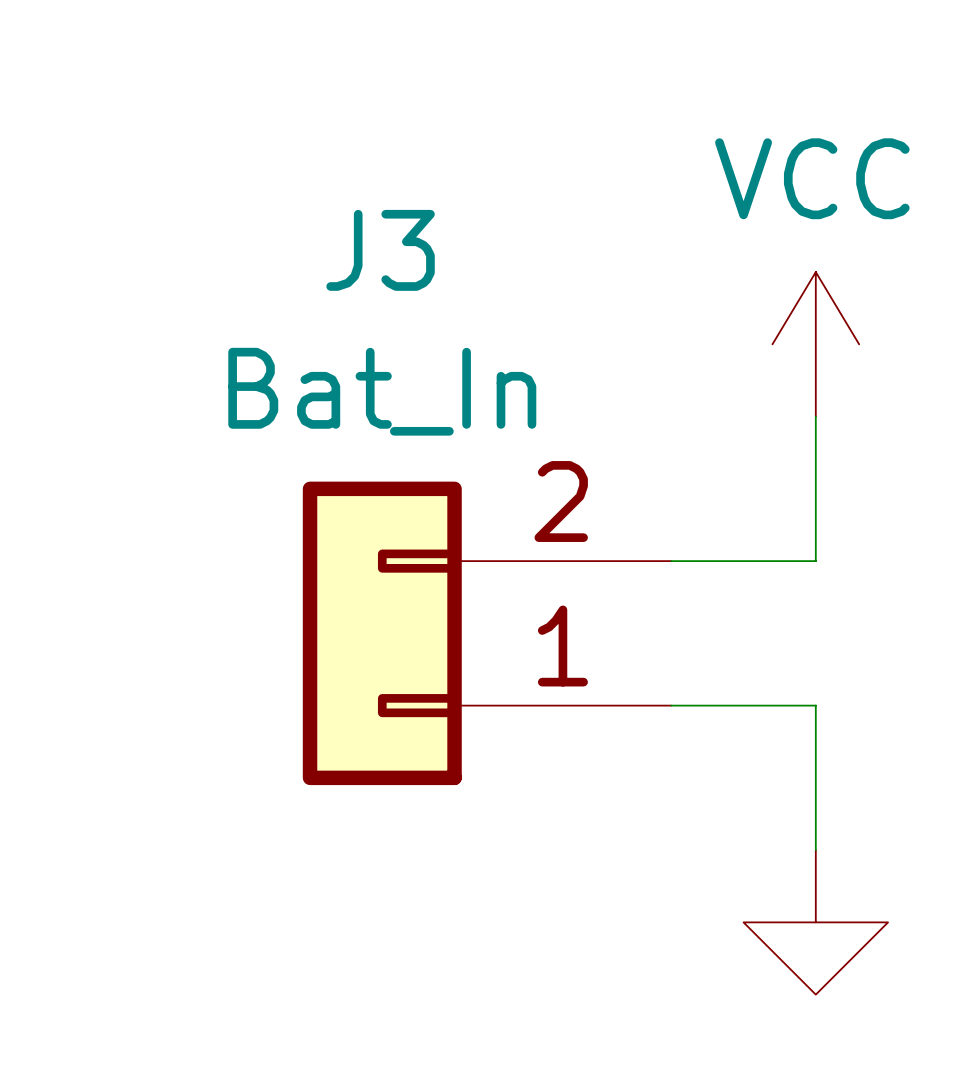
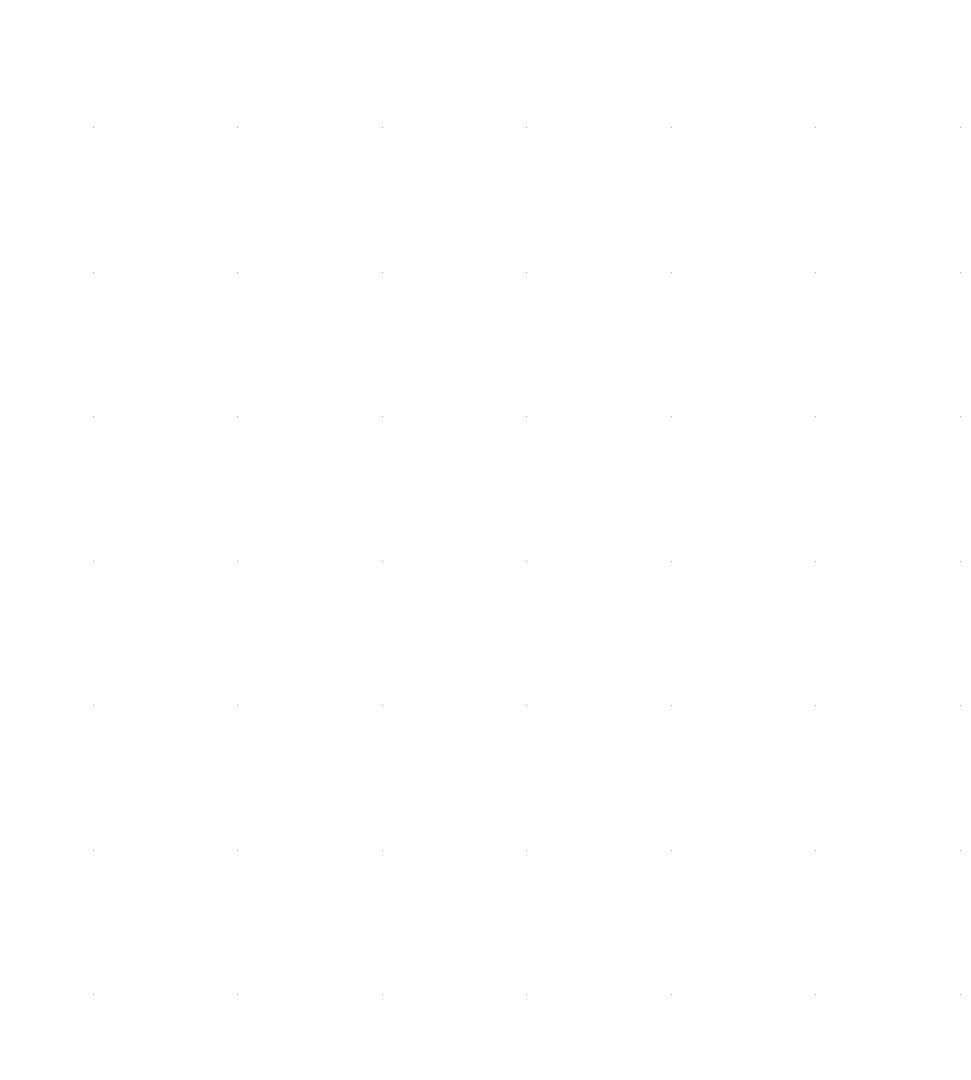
power symbol: VCC (815, 344) -> none
wire: (815, 416) (815, 561) (671, 561) -> none
J3: Bat_In (487, 633) -> none
wire: (671, 705) (815, 705) (815, 850) -> none
power symbol: (815, 922) -> none

